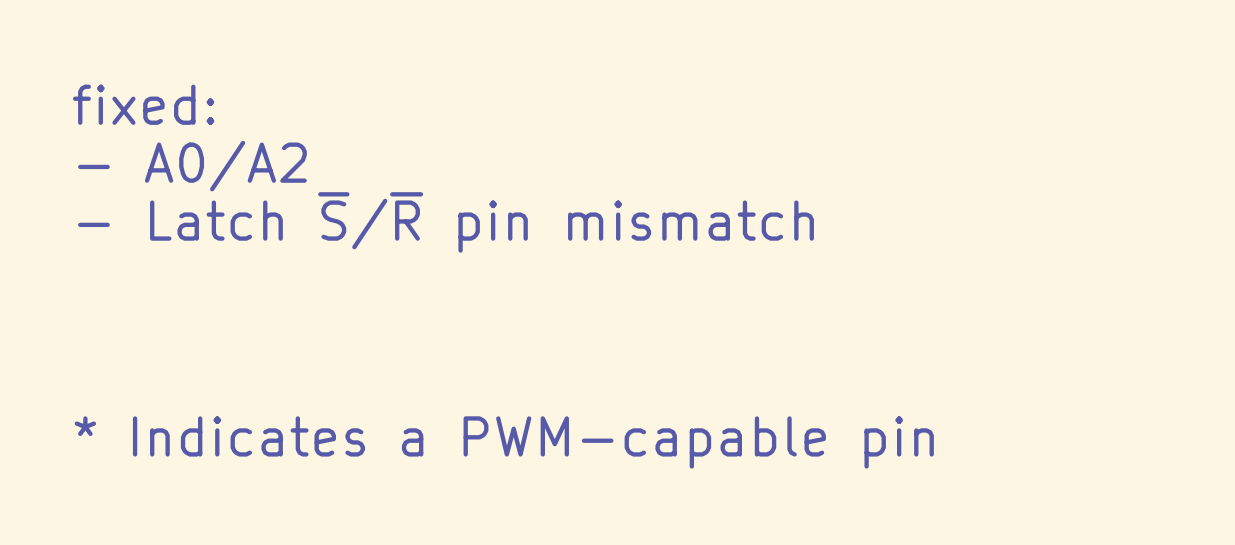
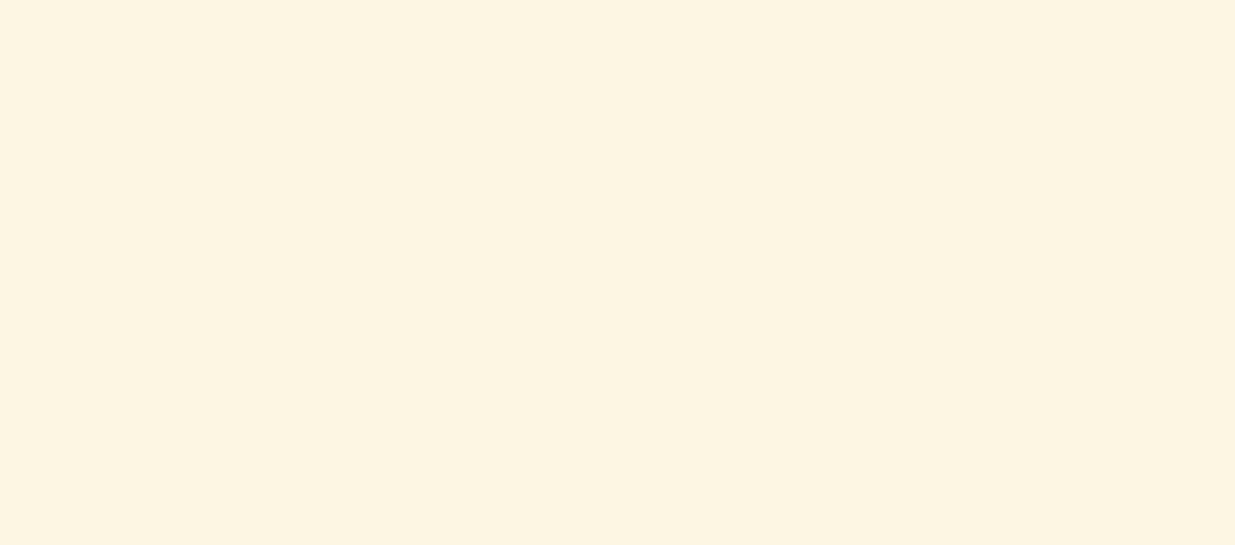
text: fixed: (143, 104) -> none
text: - A0/A2 (192, 166) -> none
text: - Latch ~{S}/~{R} pin mismatch (446, 222) -> none
text: * Indicates a PWM-capable pin (504, 442) -> none

